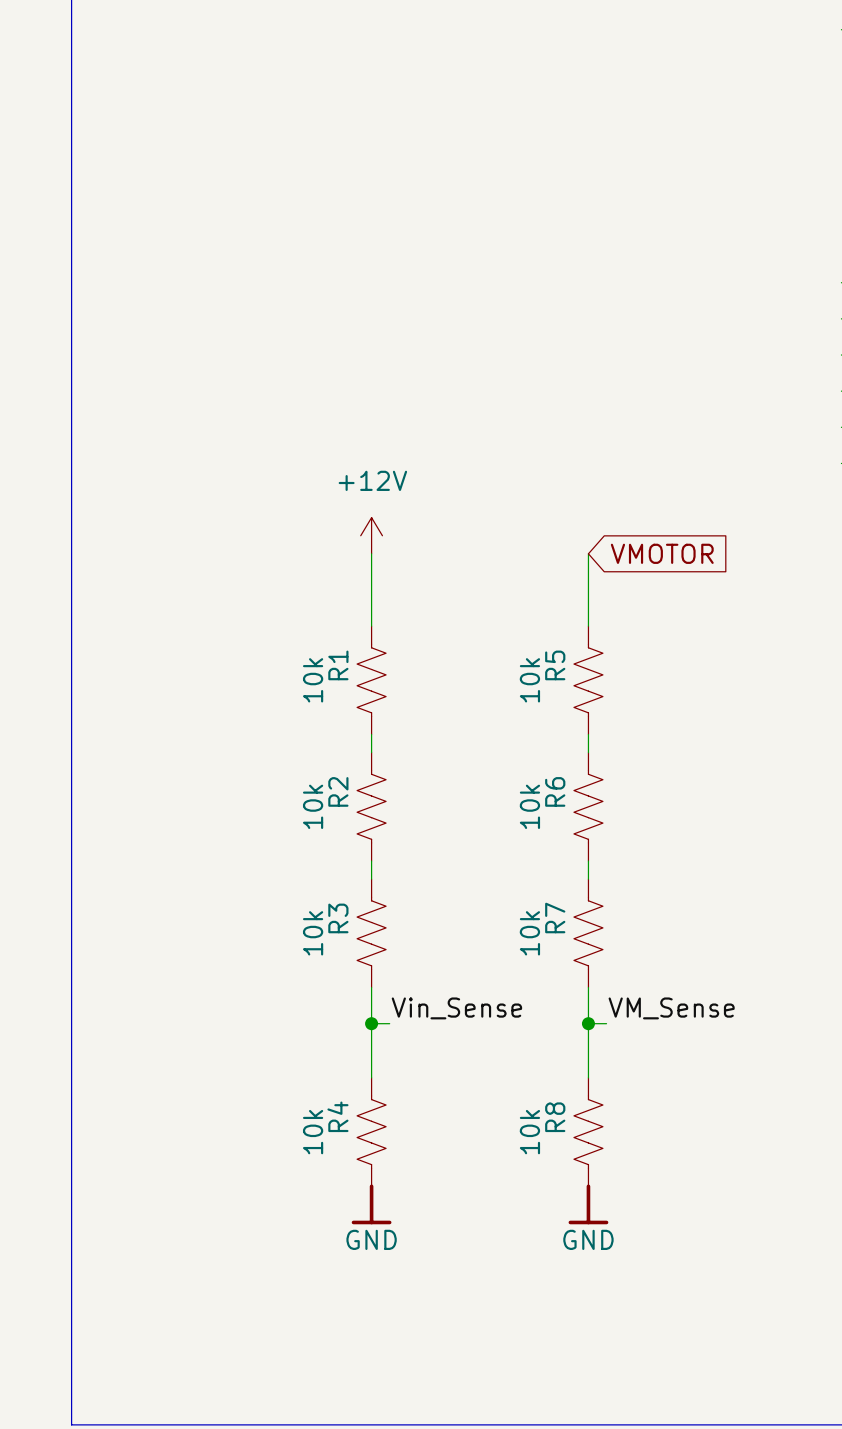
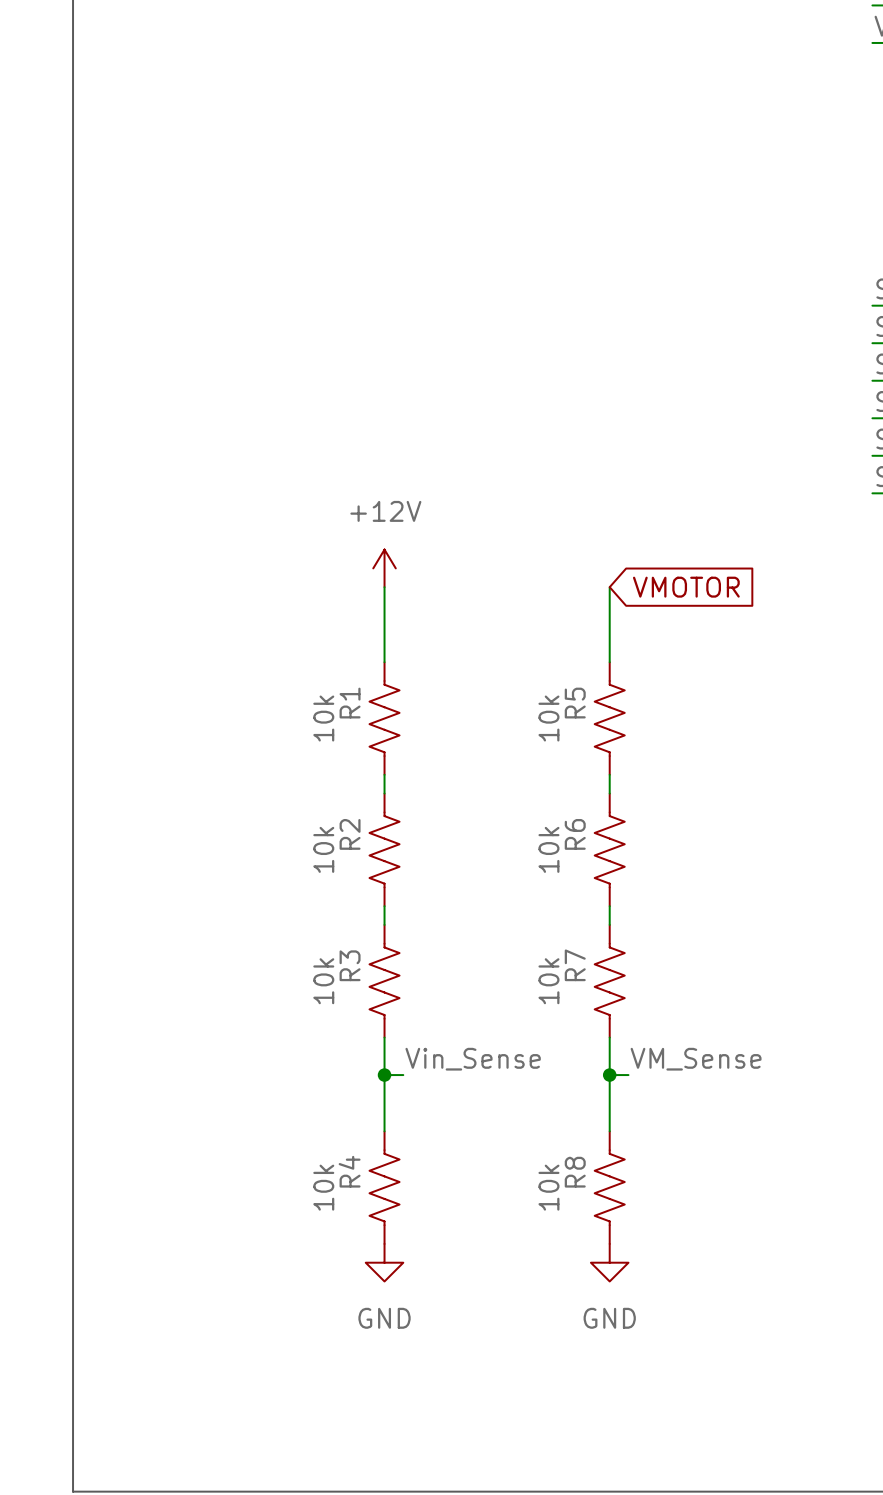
power symbol shape: [351, 1184, 392, 1225] -> [365, 1243, 404, 1282]
power symbol shape: [568, 1184, 609, 1225] -> [590, 1243, 629, 1282]

